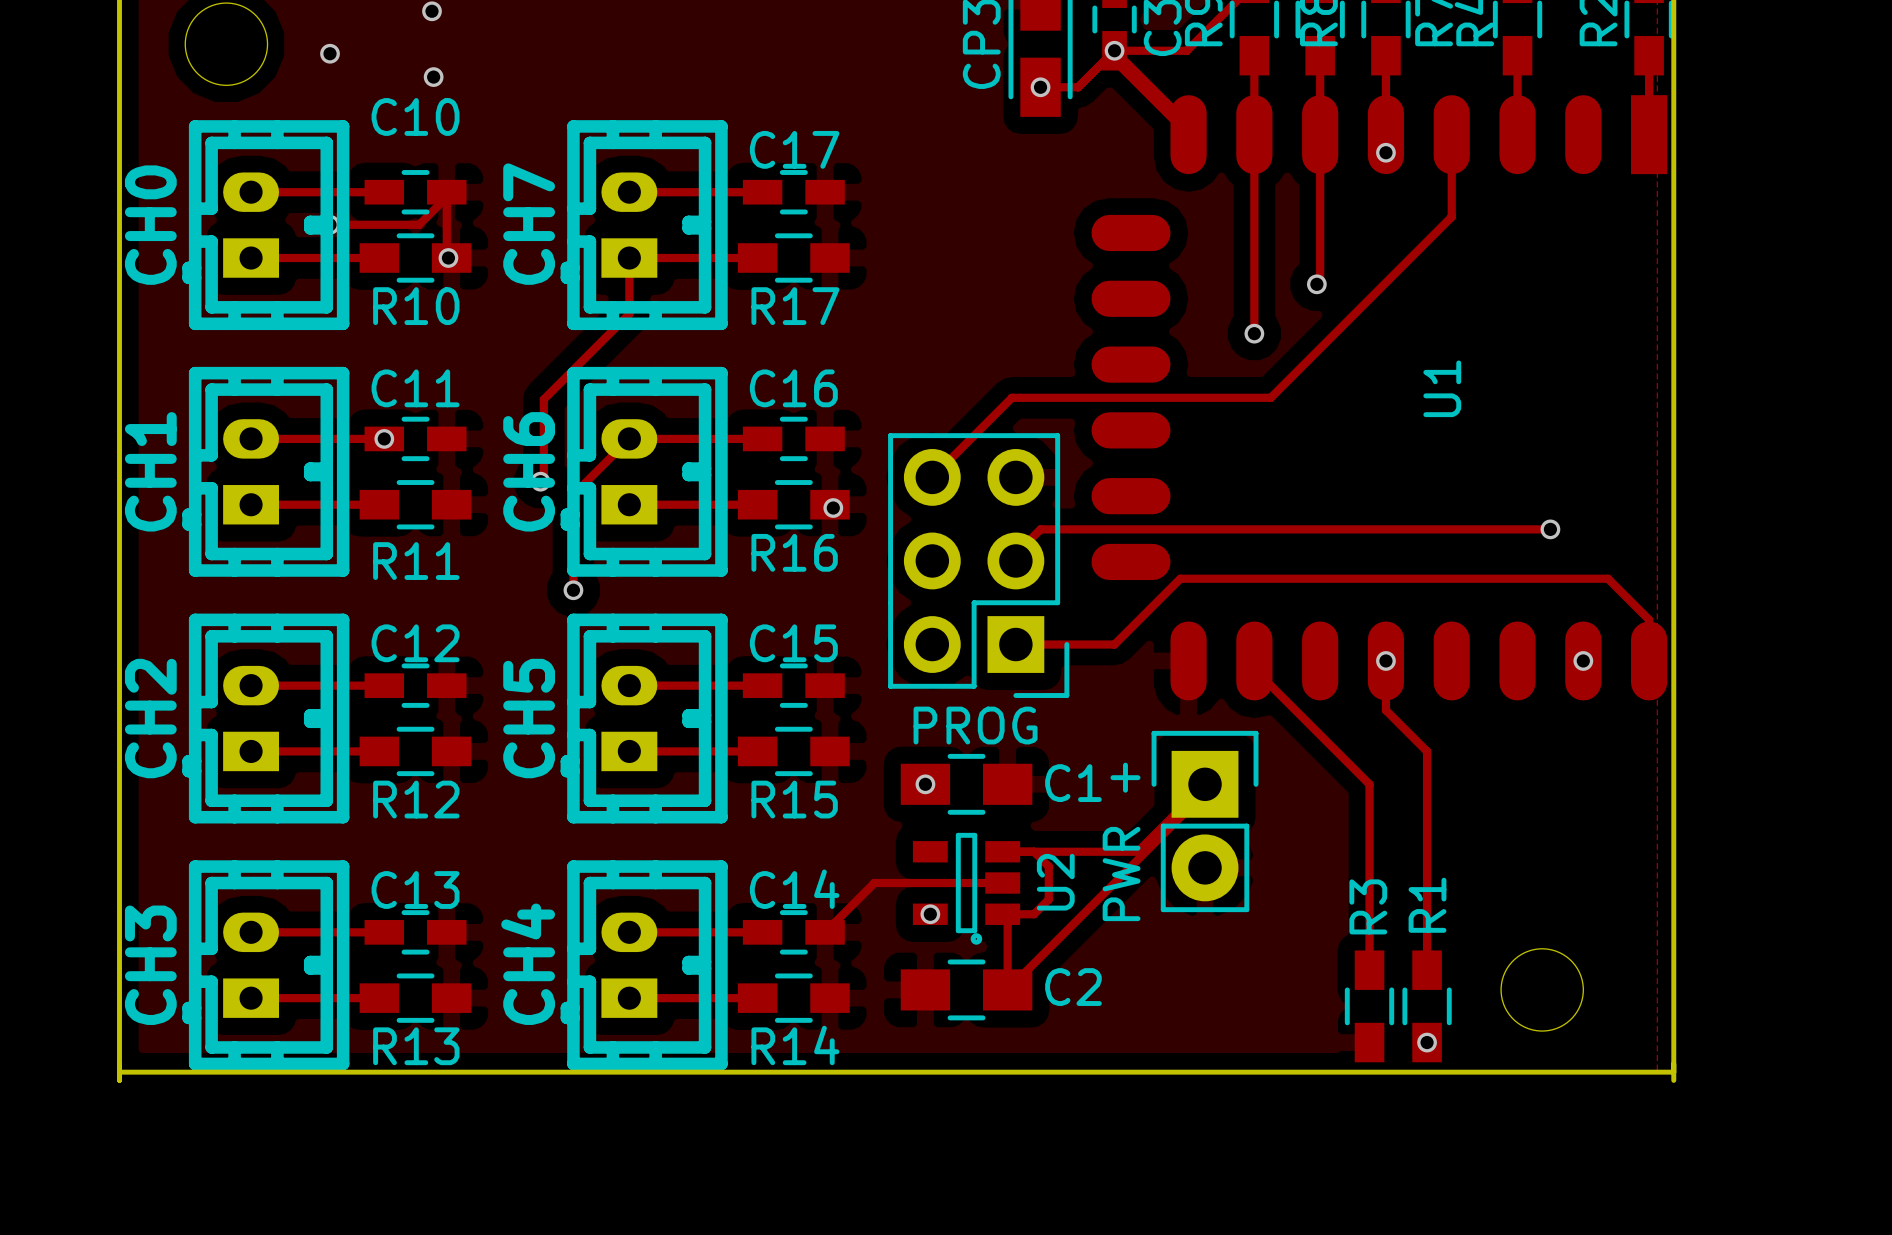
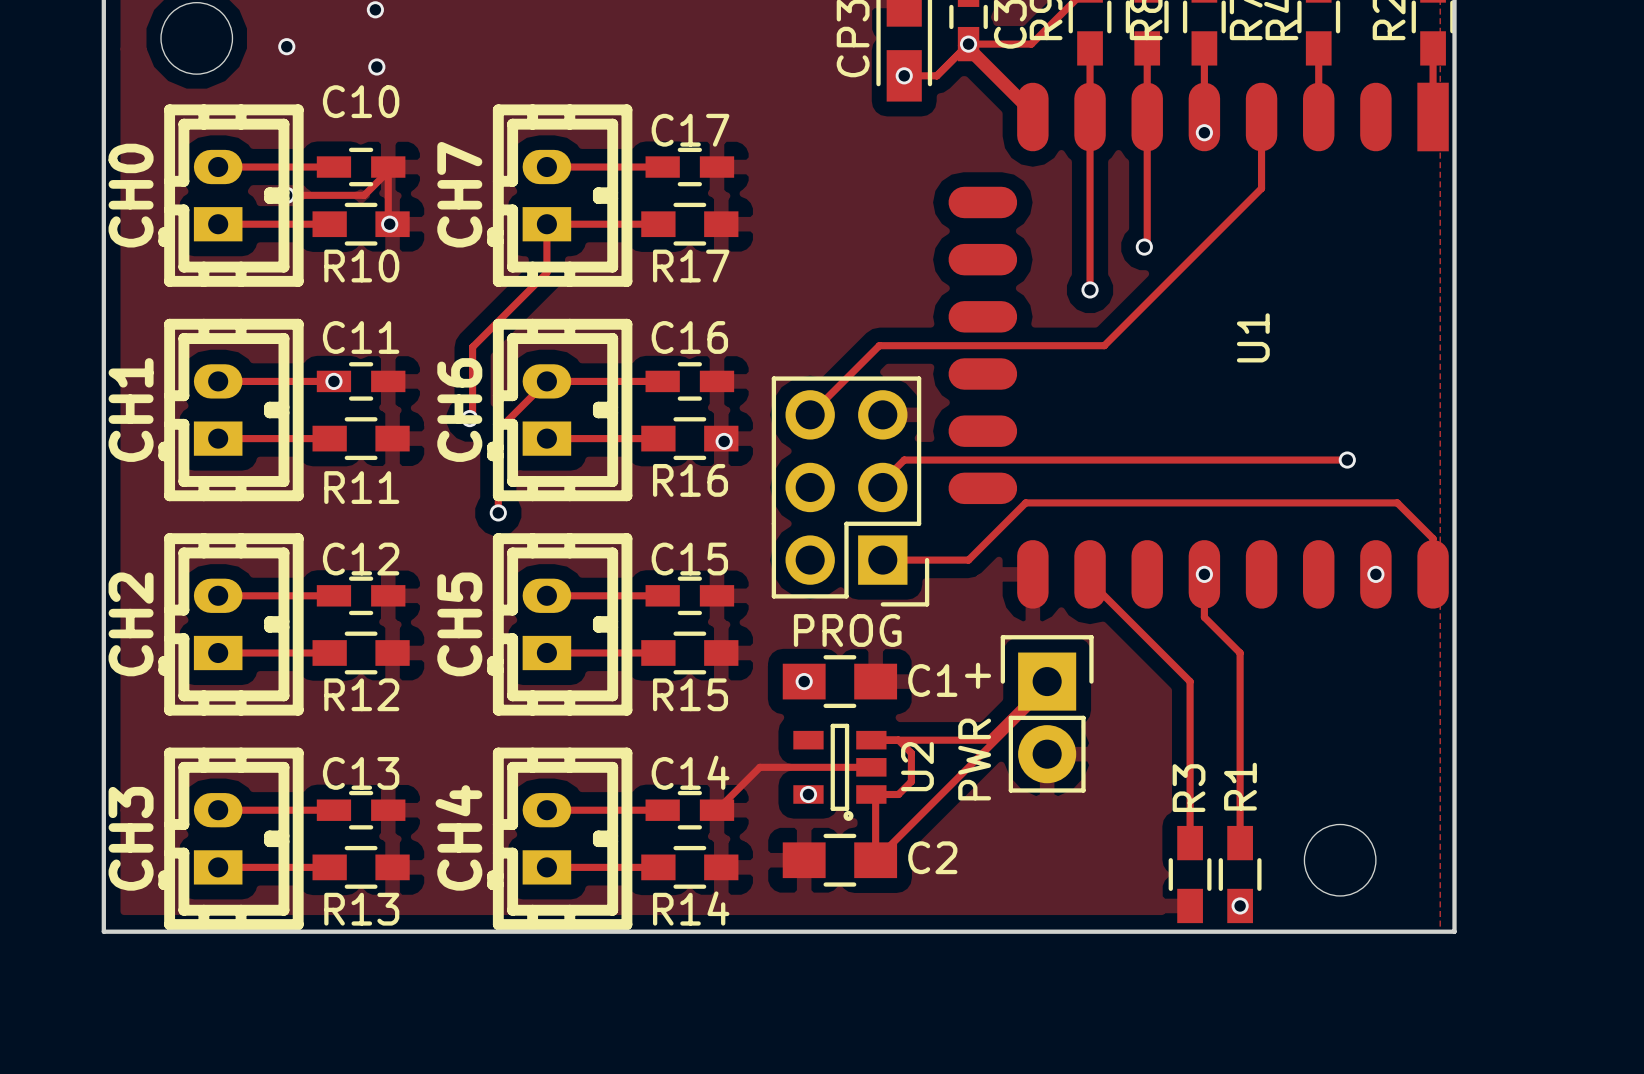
board edge: (119, 1072) (119, 1080) -> none
board edge: (1673, 1072) (1673, 1080) -> none

